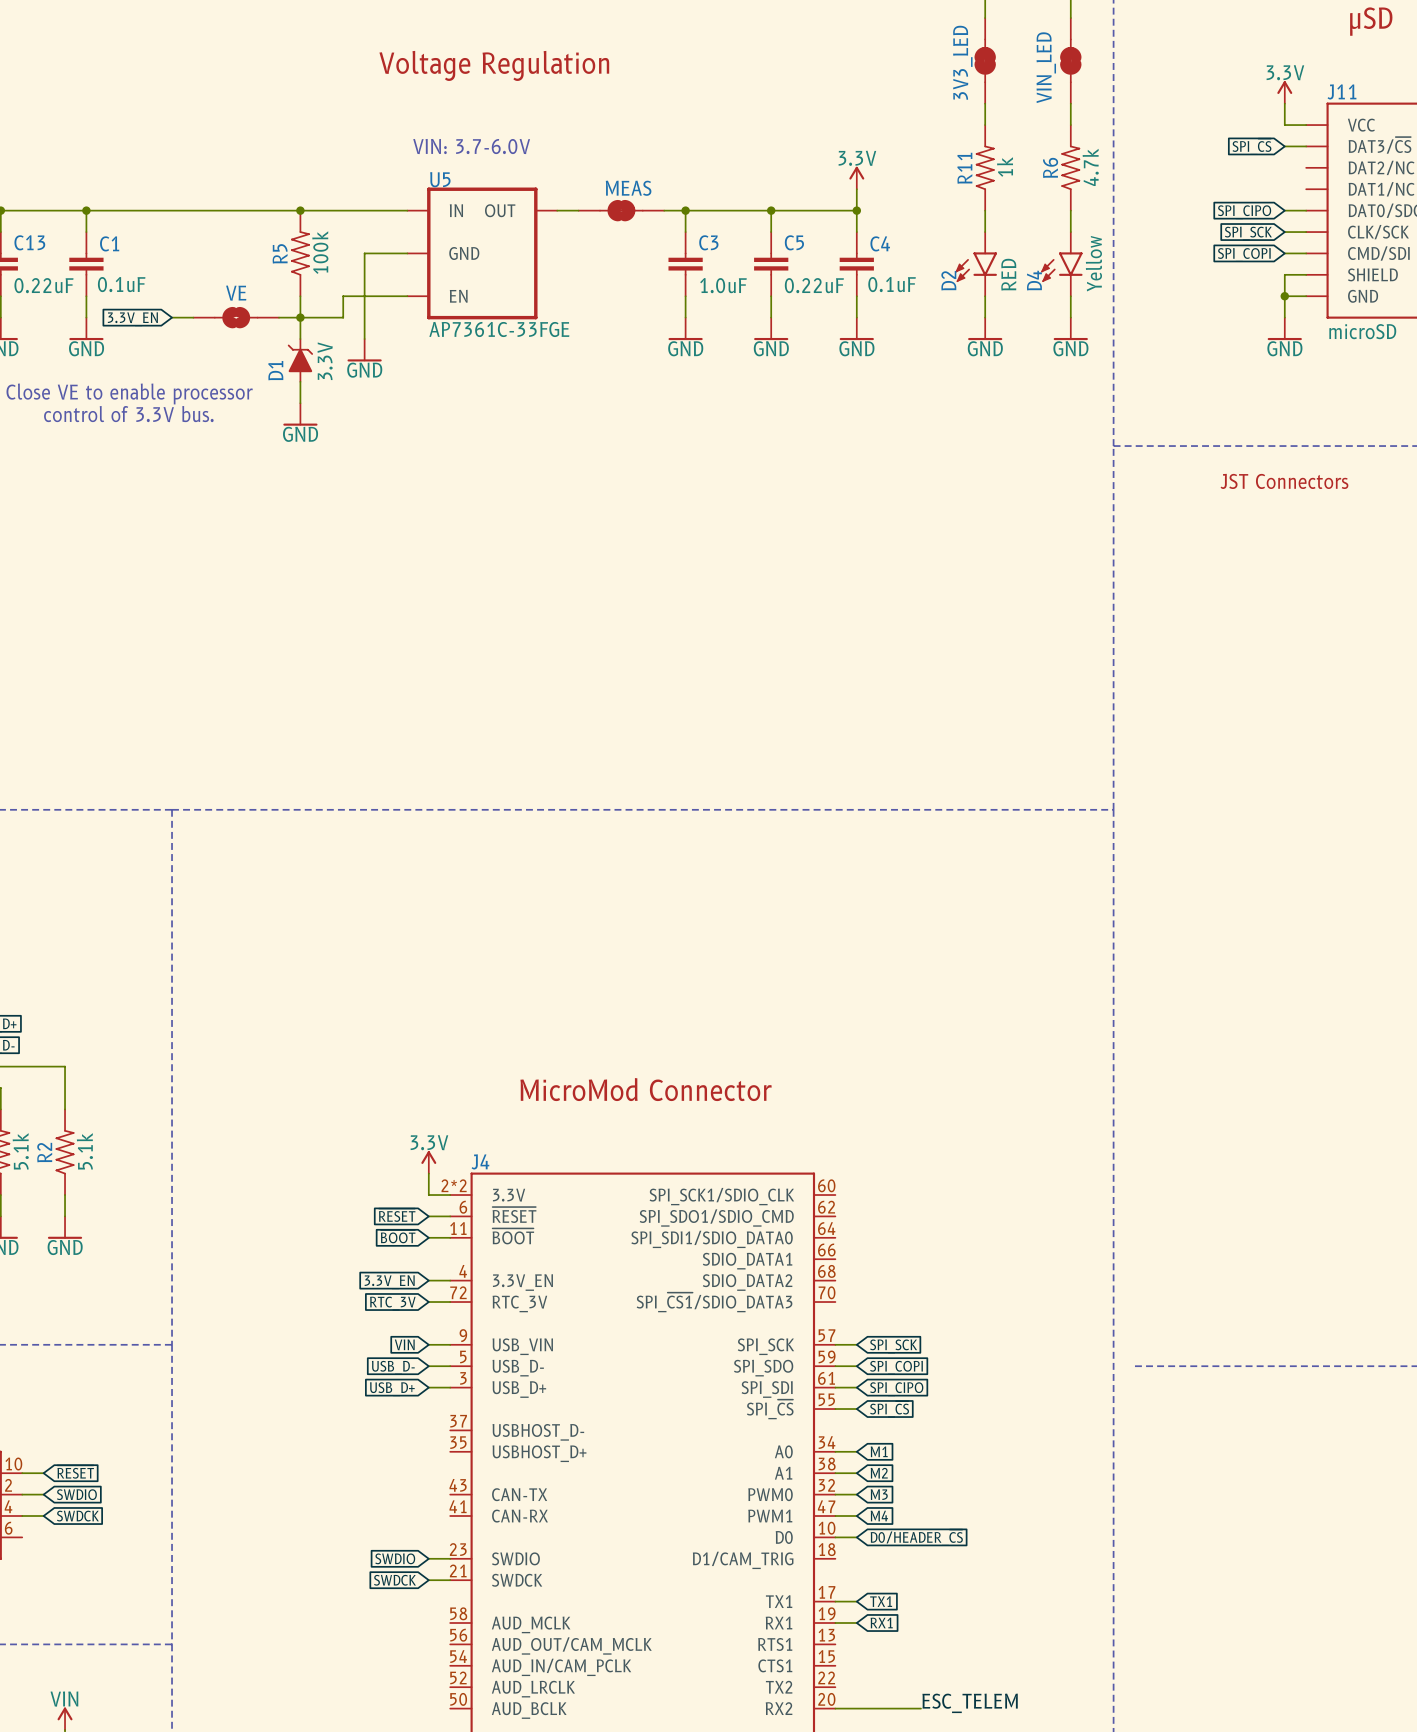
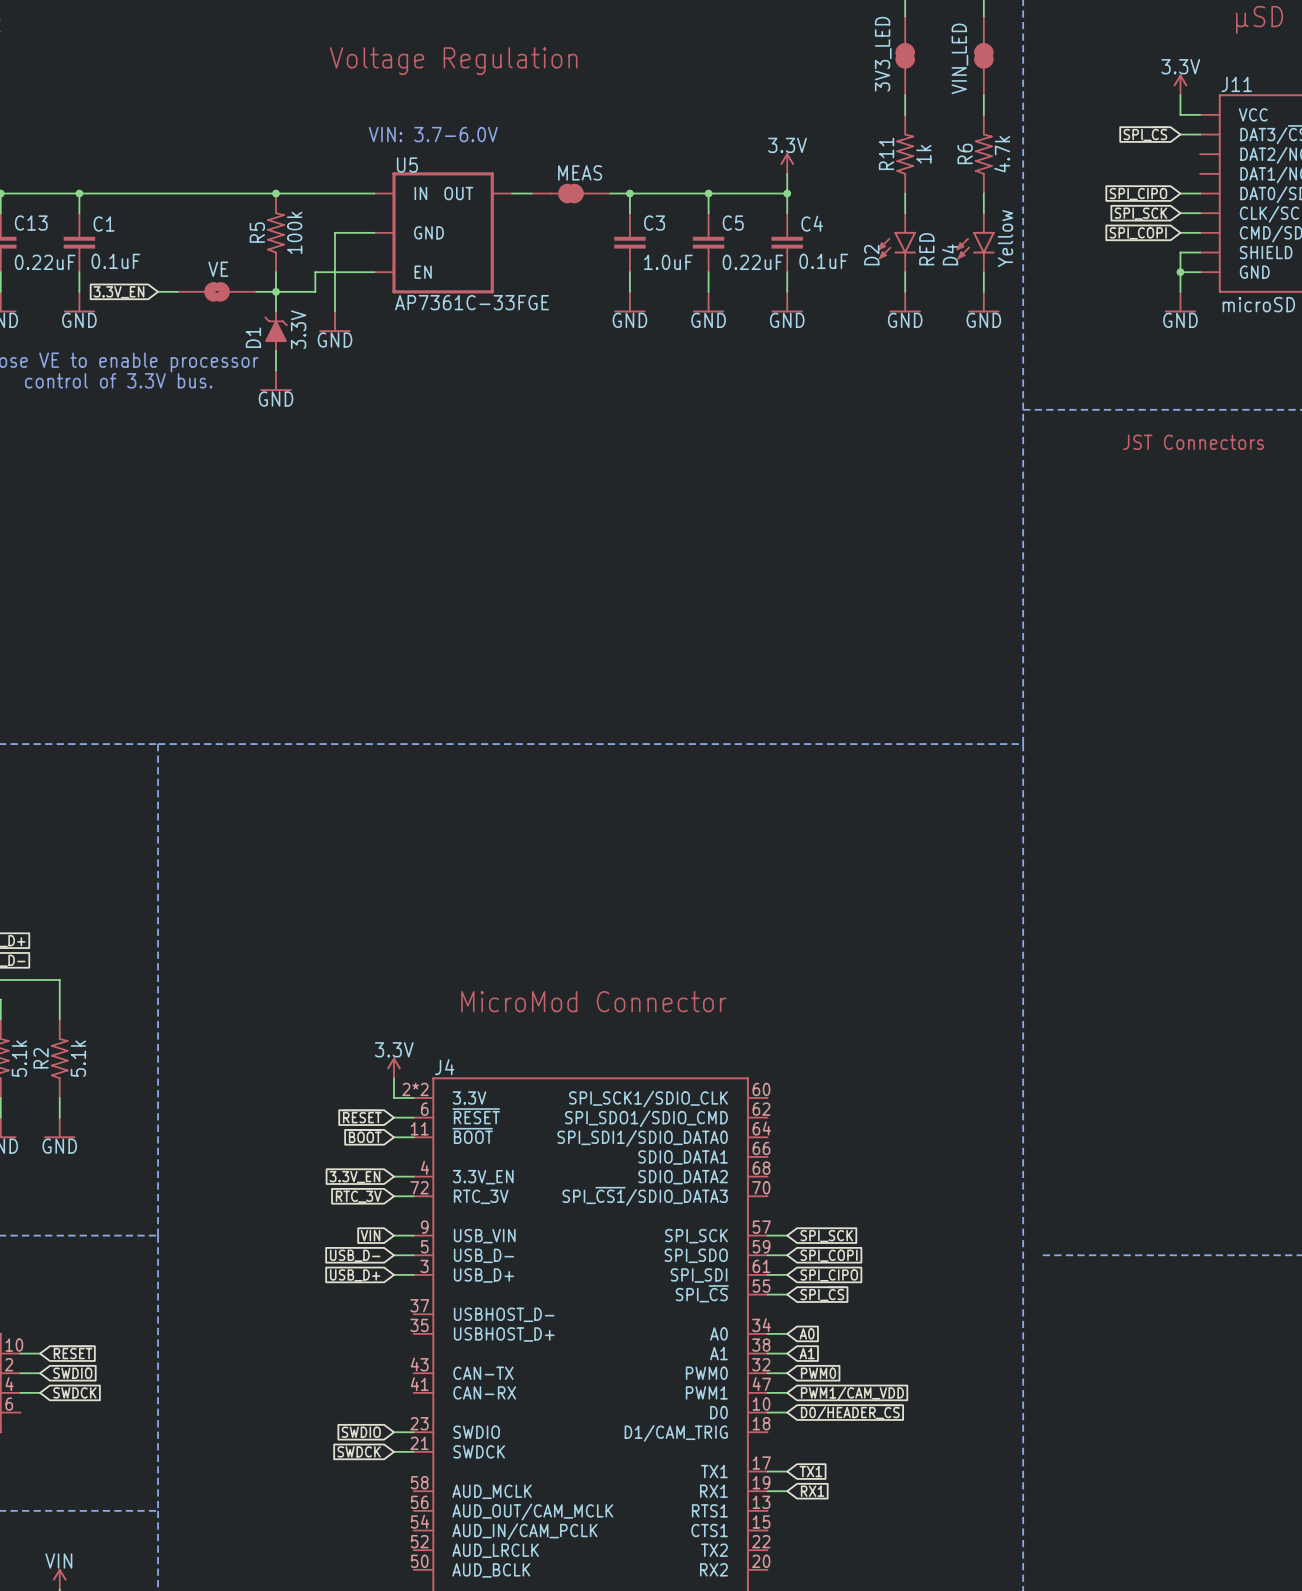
global label: M1 (879, 1451) -> A0 (807, 1333)
global label: M2 (879, 1473) -> A1 (807, 1353)
global label: M3 (879, 1494) -> PWM0 (818, 1373)
global label: M4 (879, 1516) -> PWM1/CAM_VDD (852, 1393)
label: ESC_TELEM (970, 1703) -> none
wire: (835, 1708) (920, 1708) -> none

